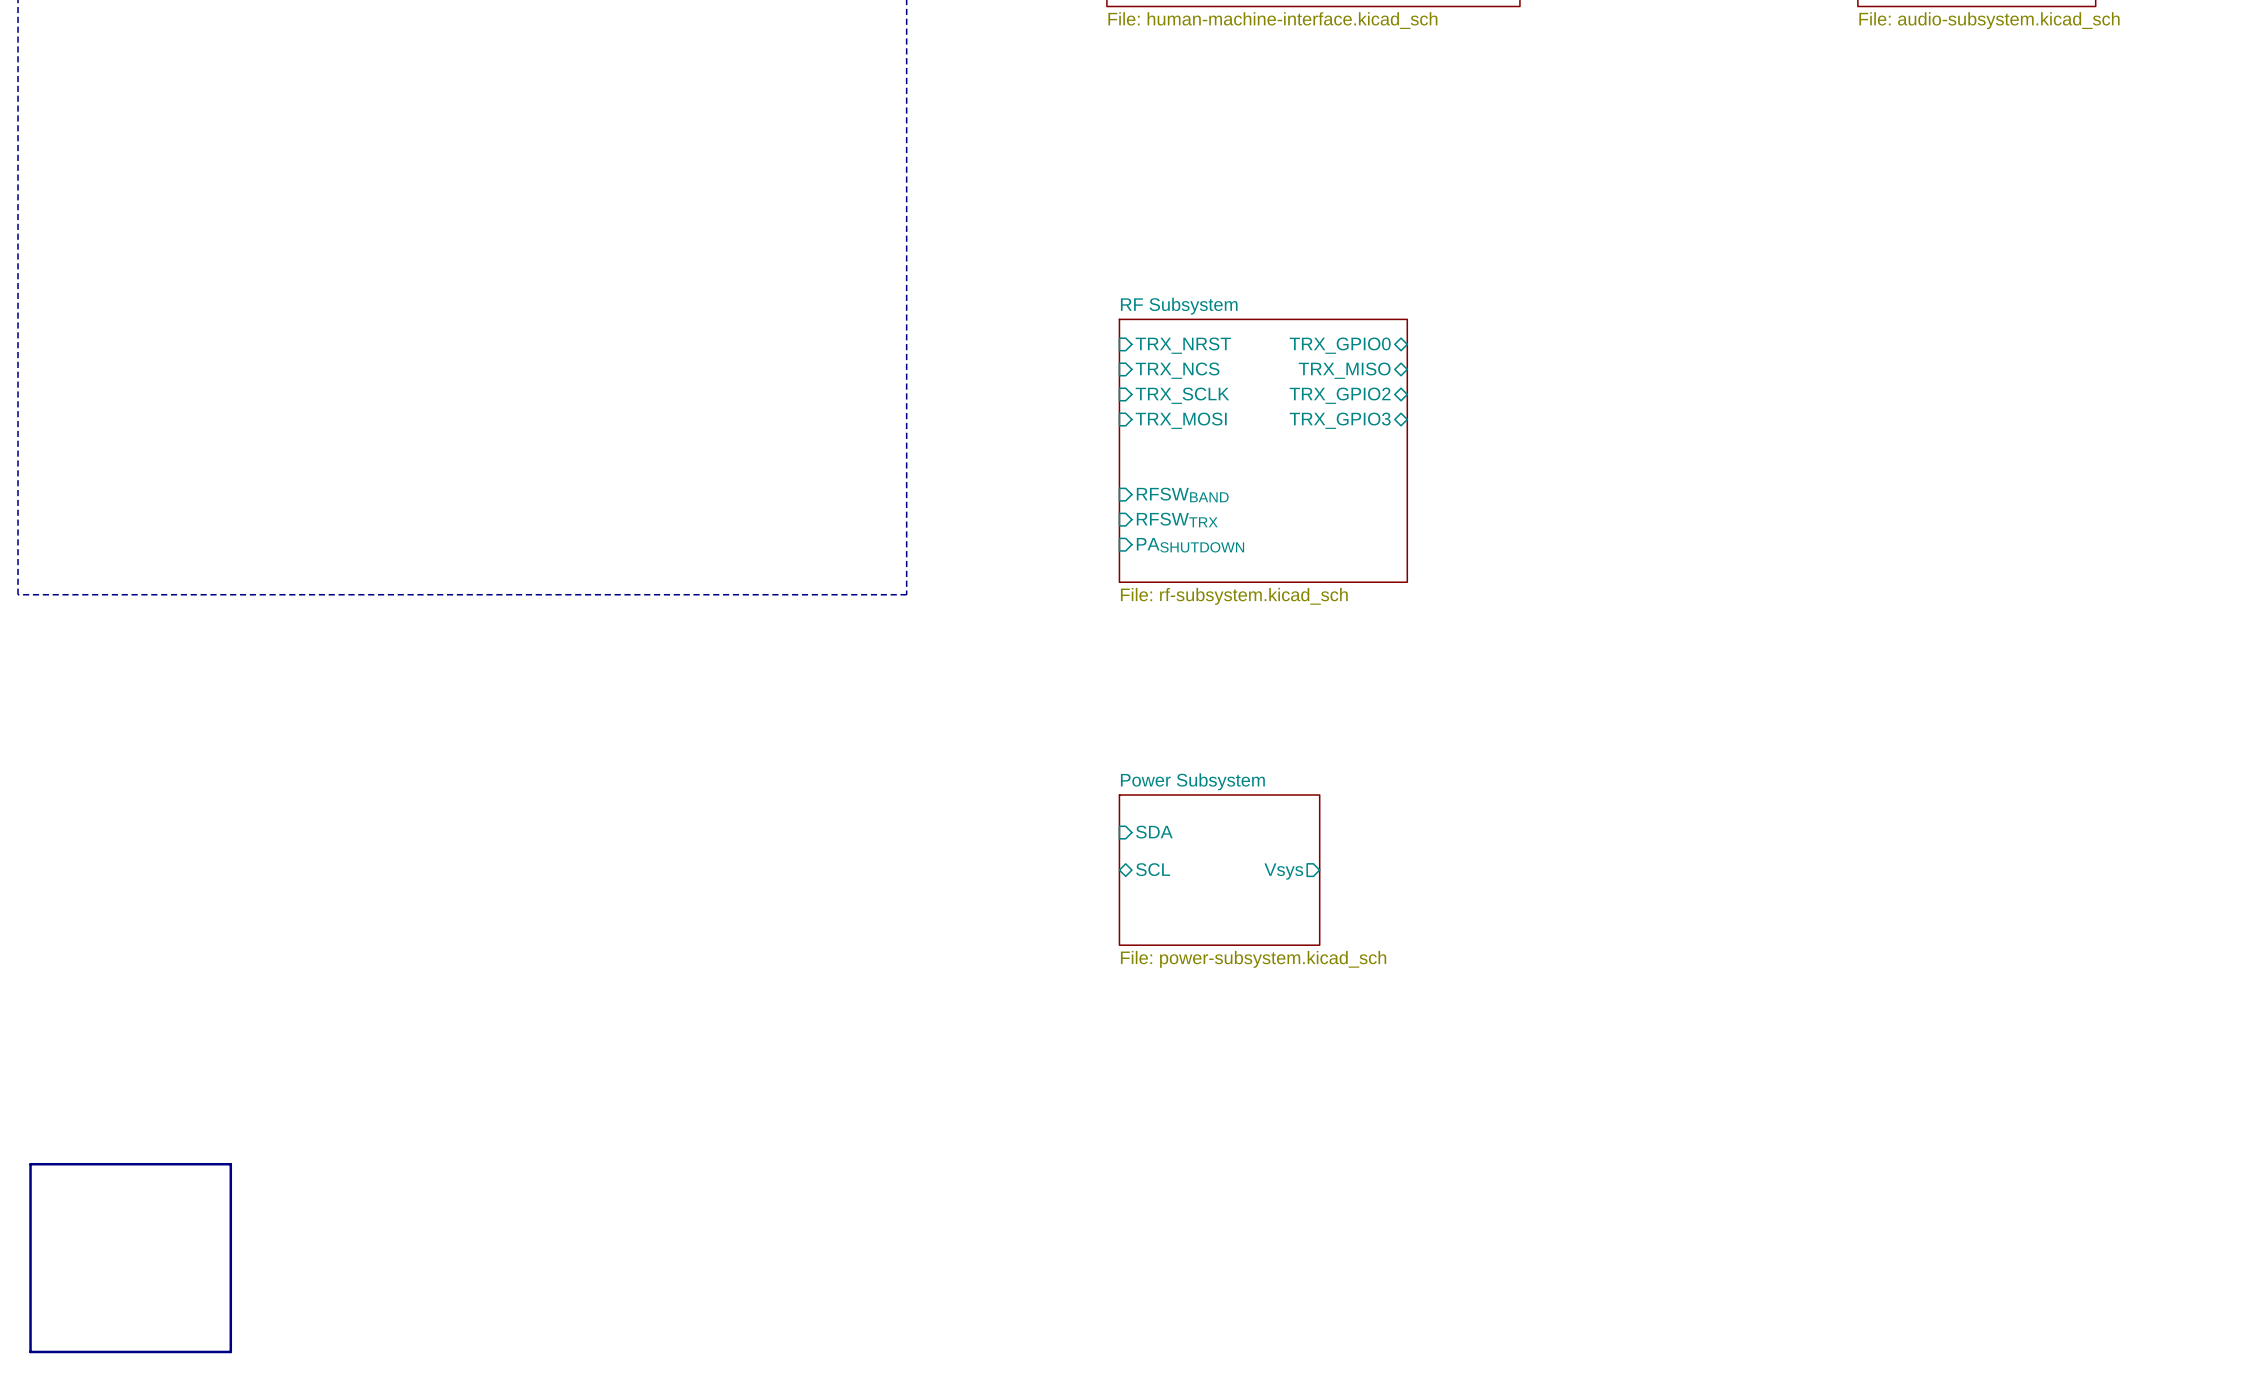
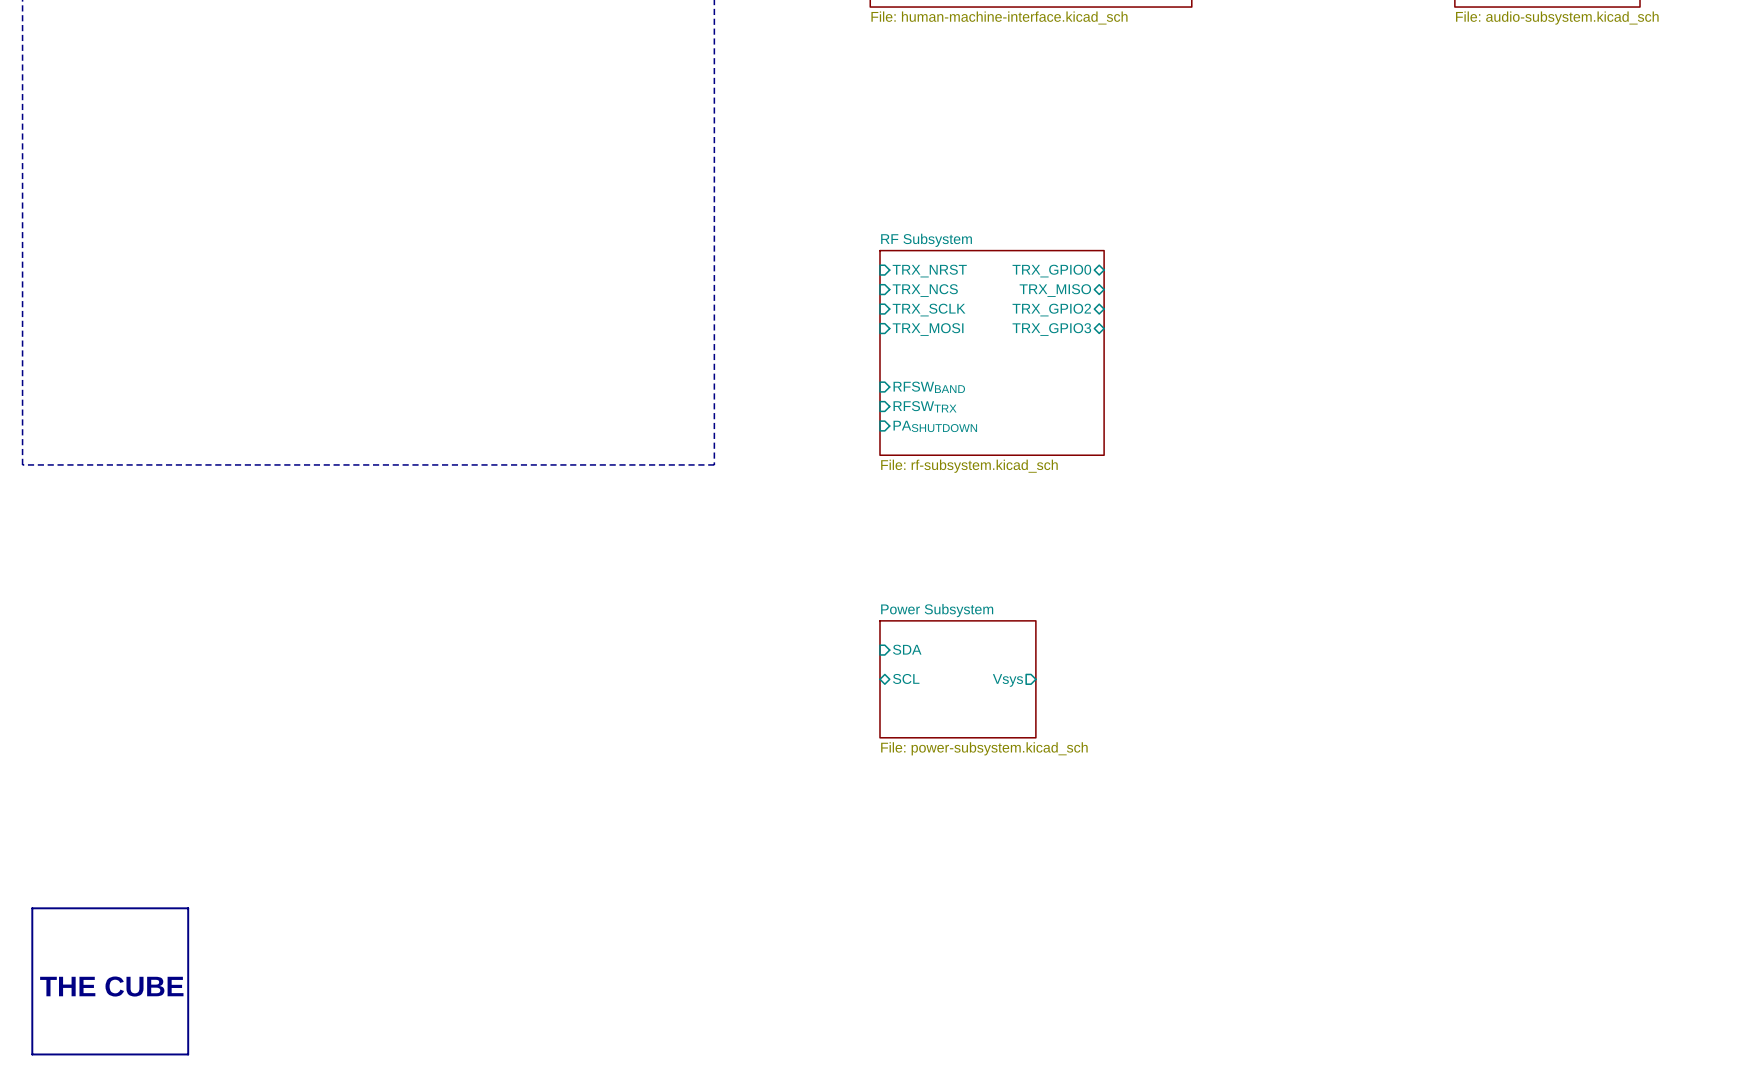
text: none -> THE CUBE (111, 986)

